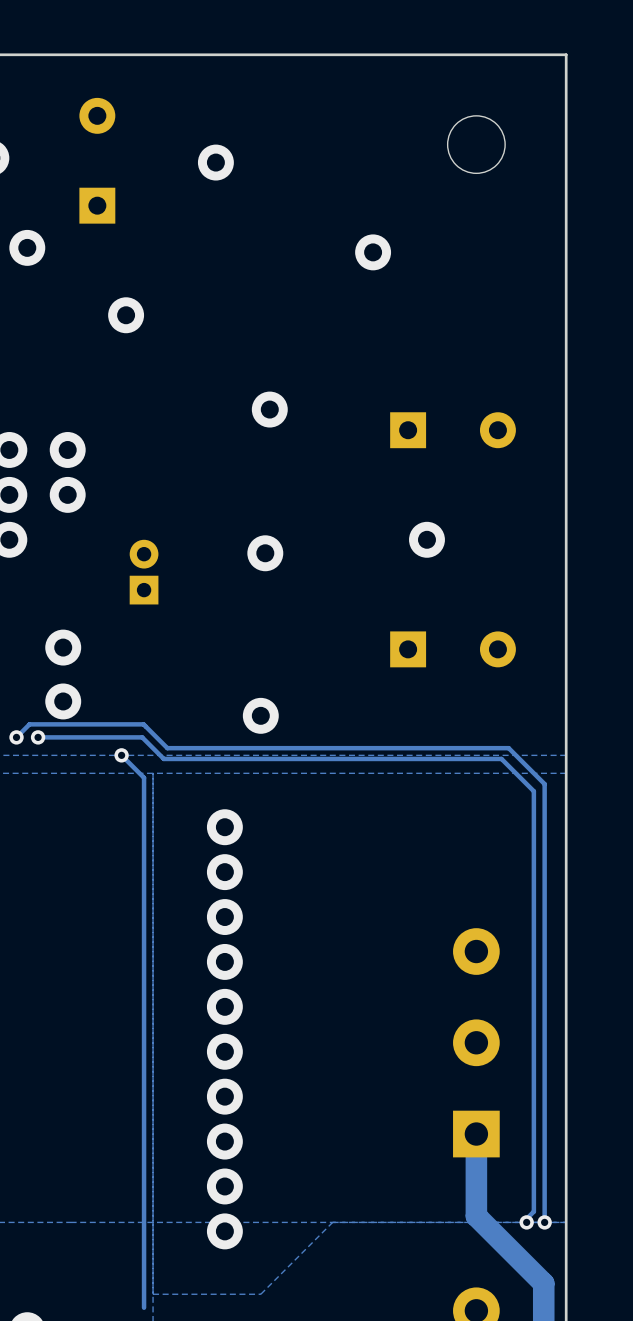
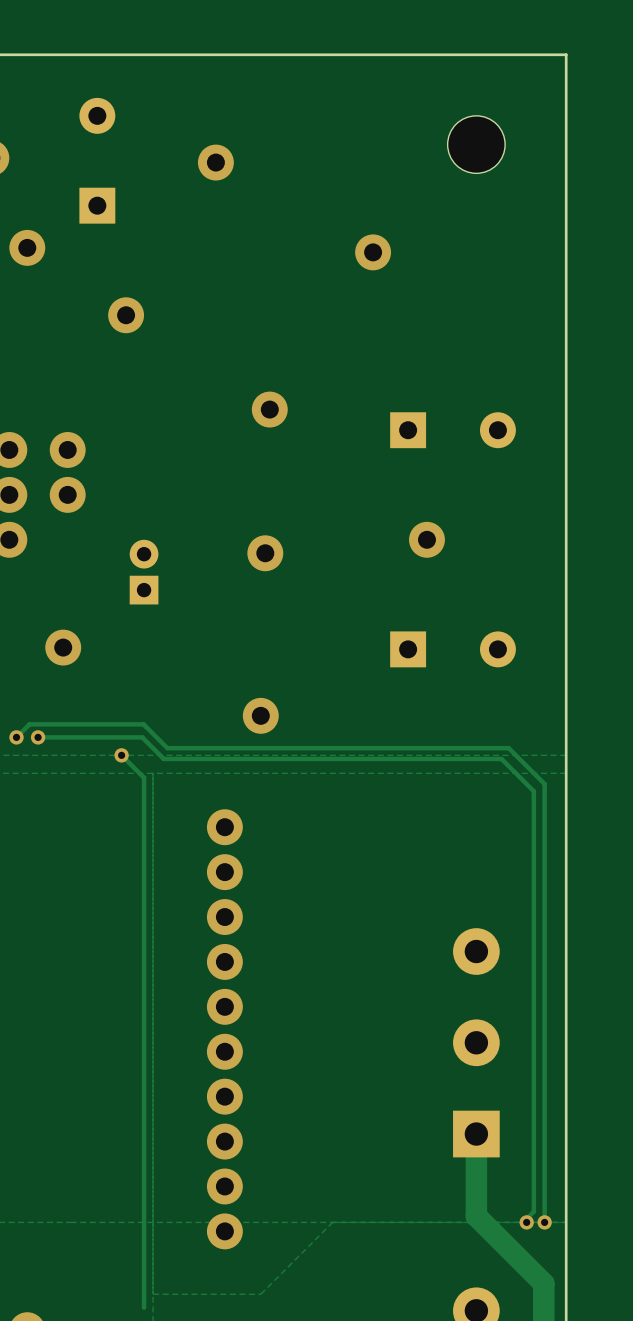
via: (63, 701) -> none

